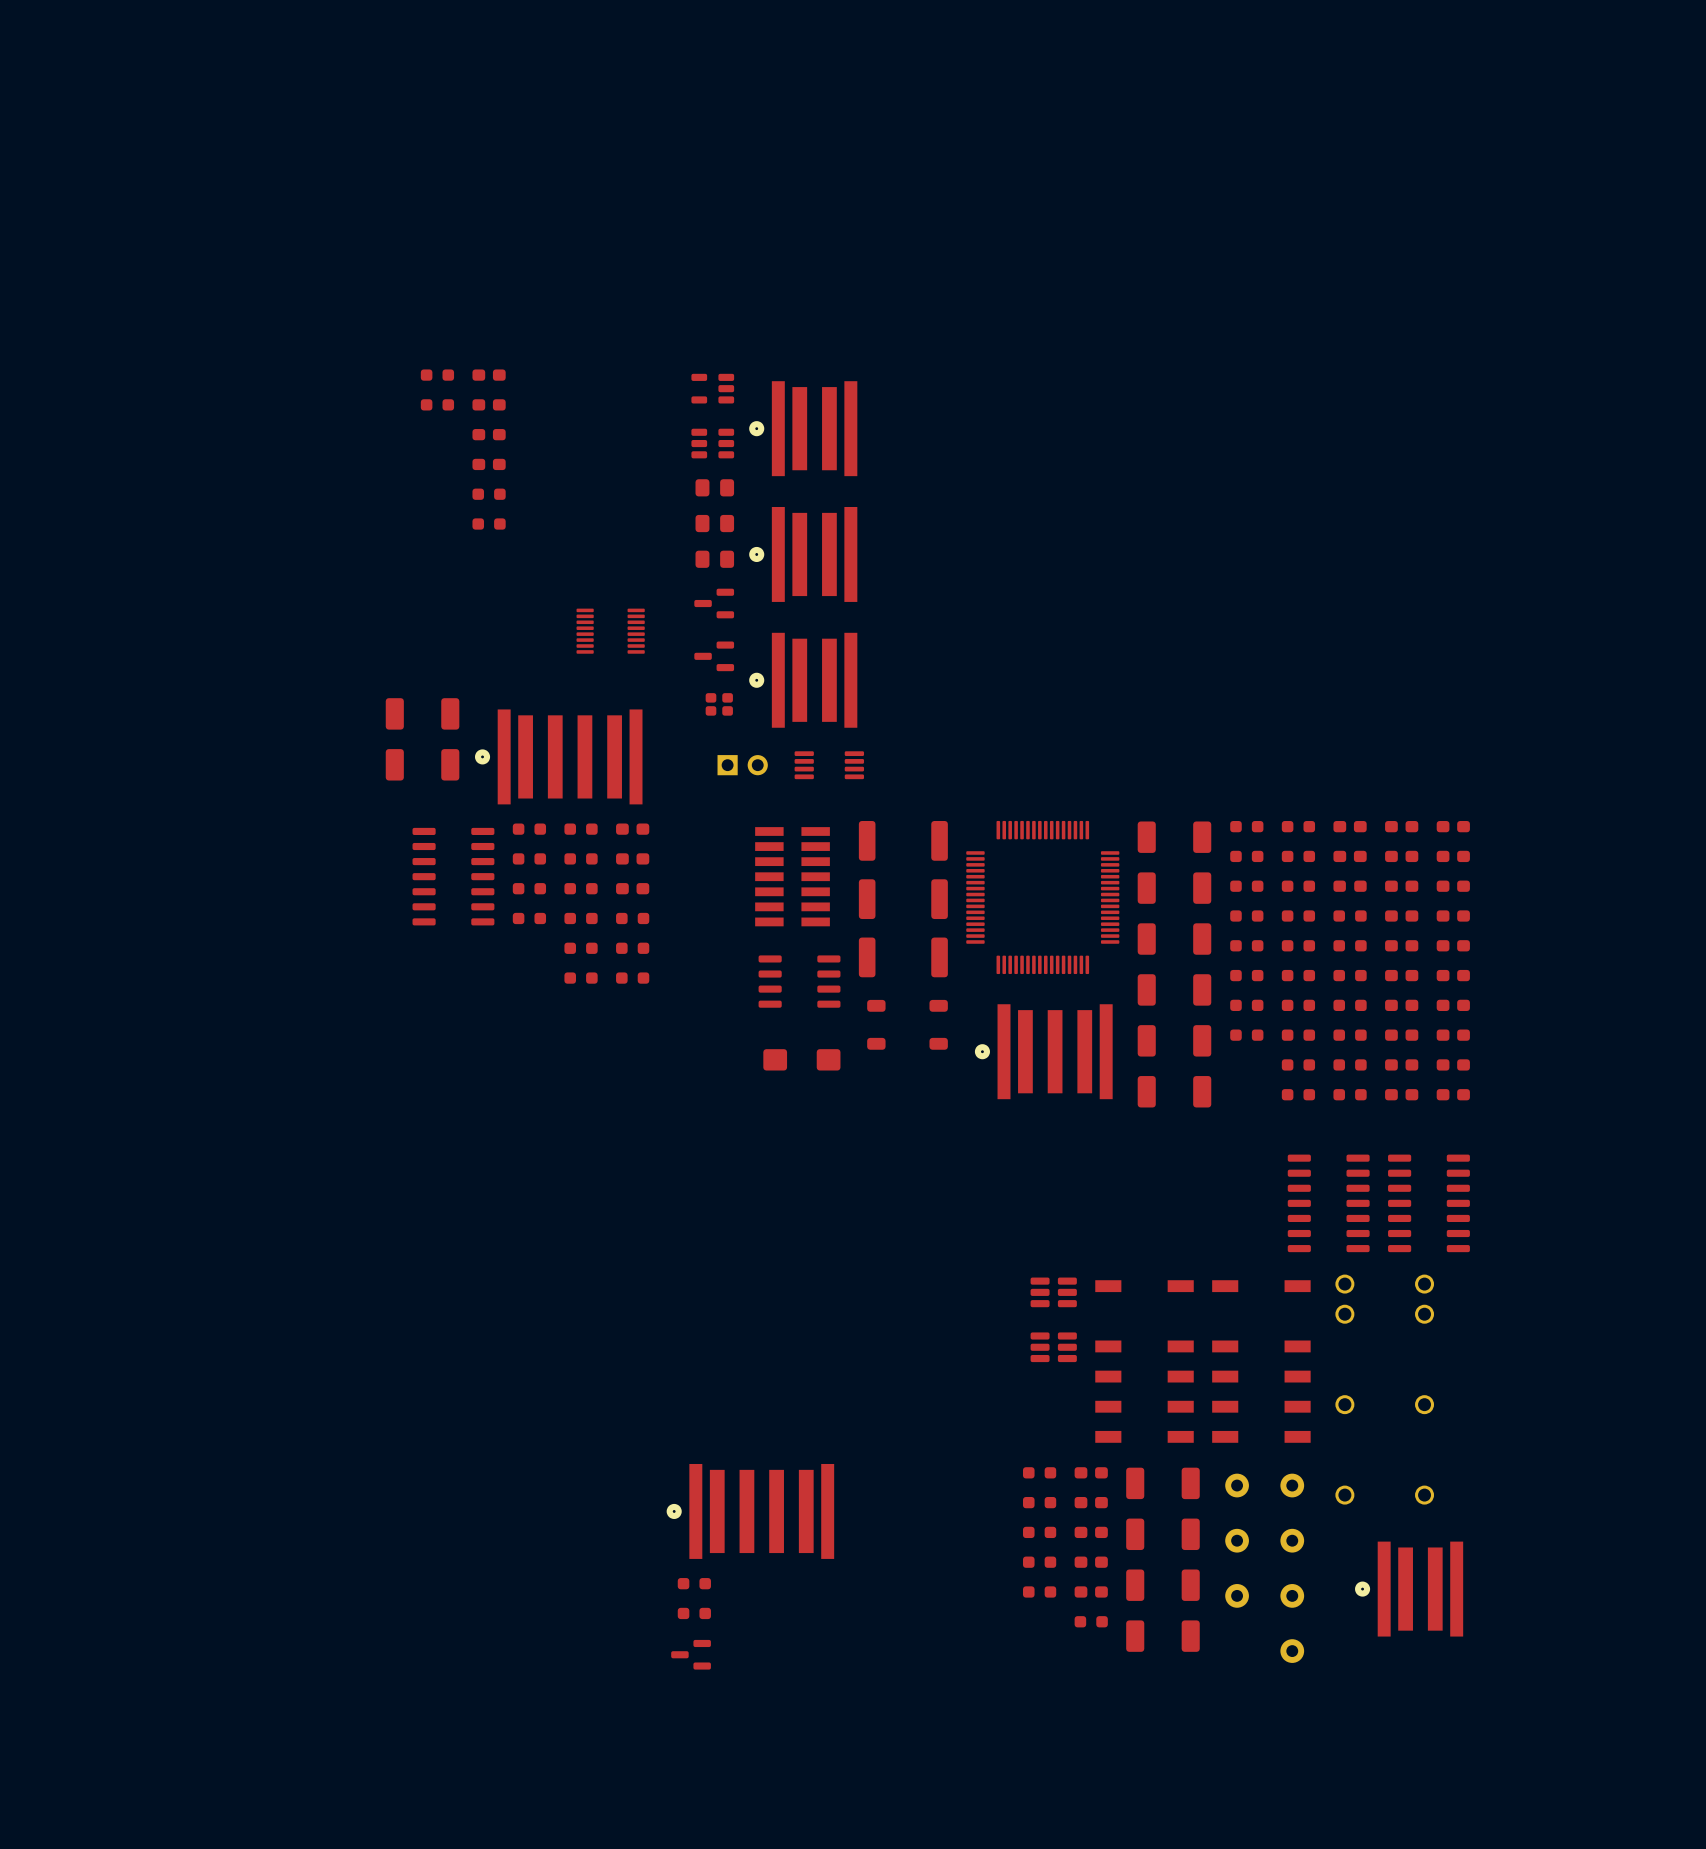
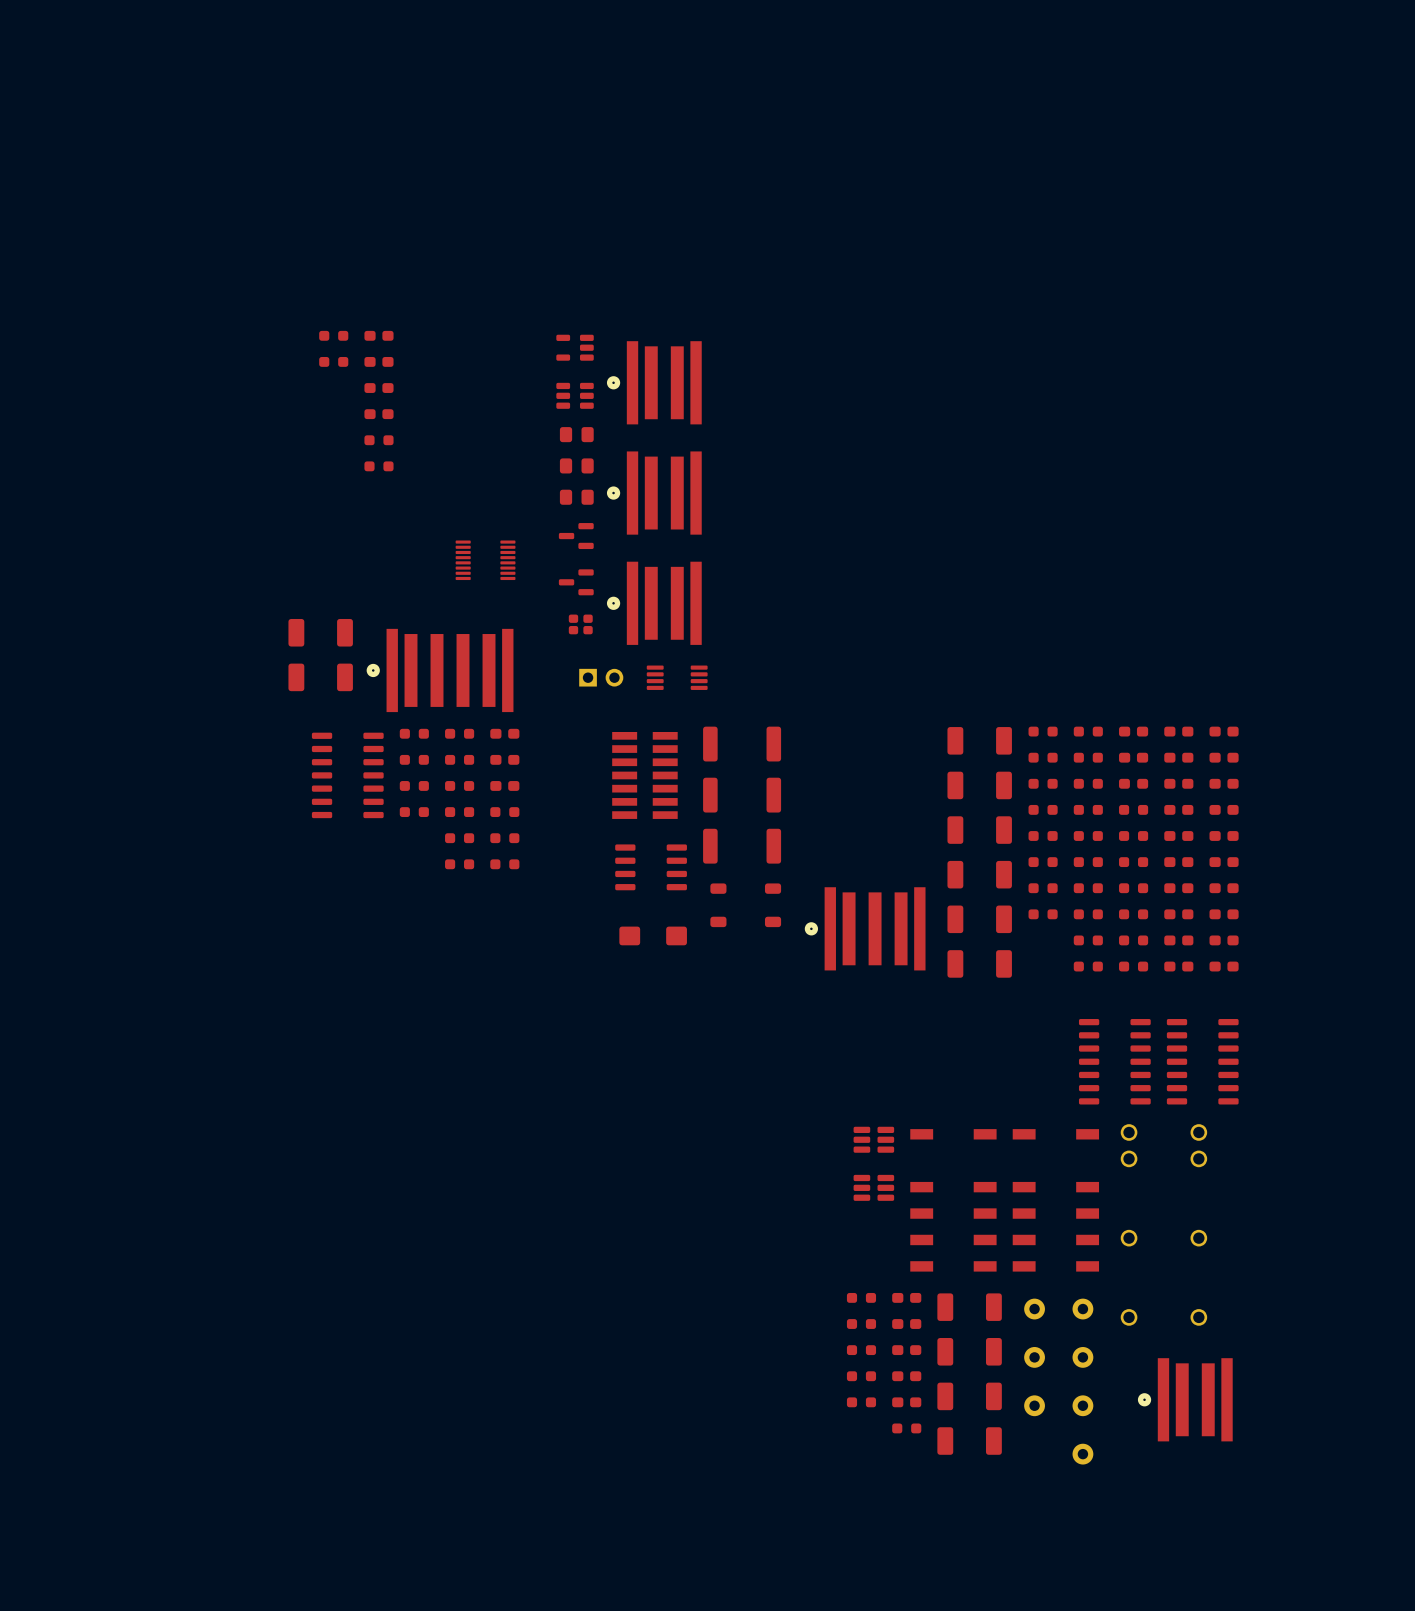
part: (1042, 897) -> none
part: (750, 1511) -> none
part: (694, 1583) -> none
part: (694, 1613) -> none
part: (691, 1654) -> none

